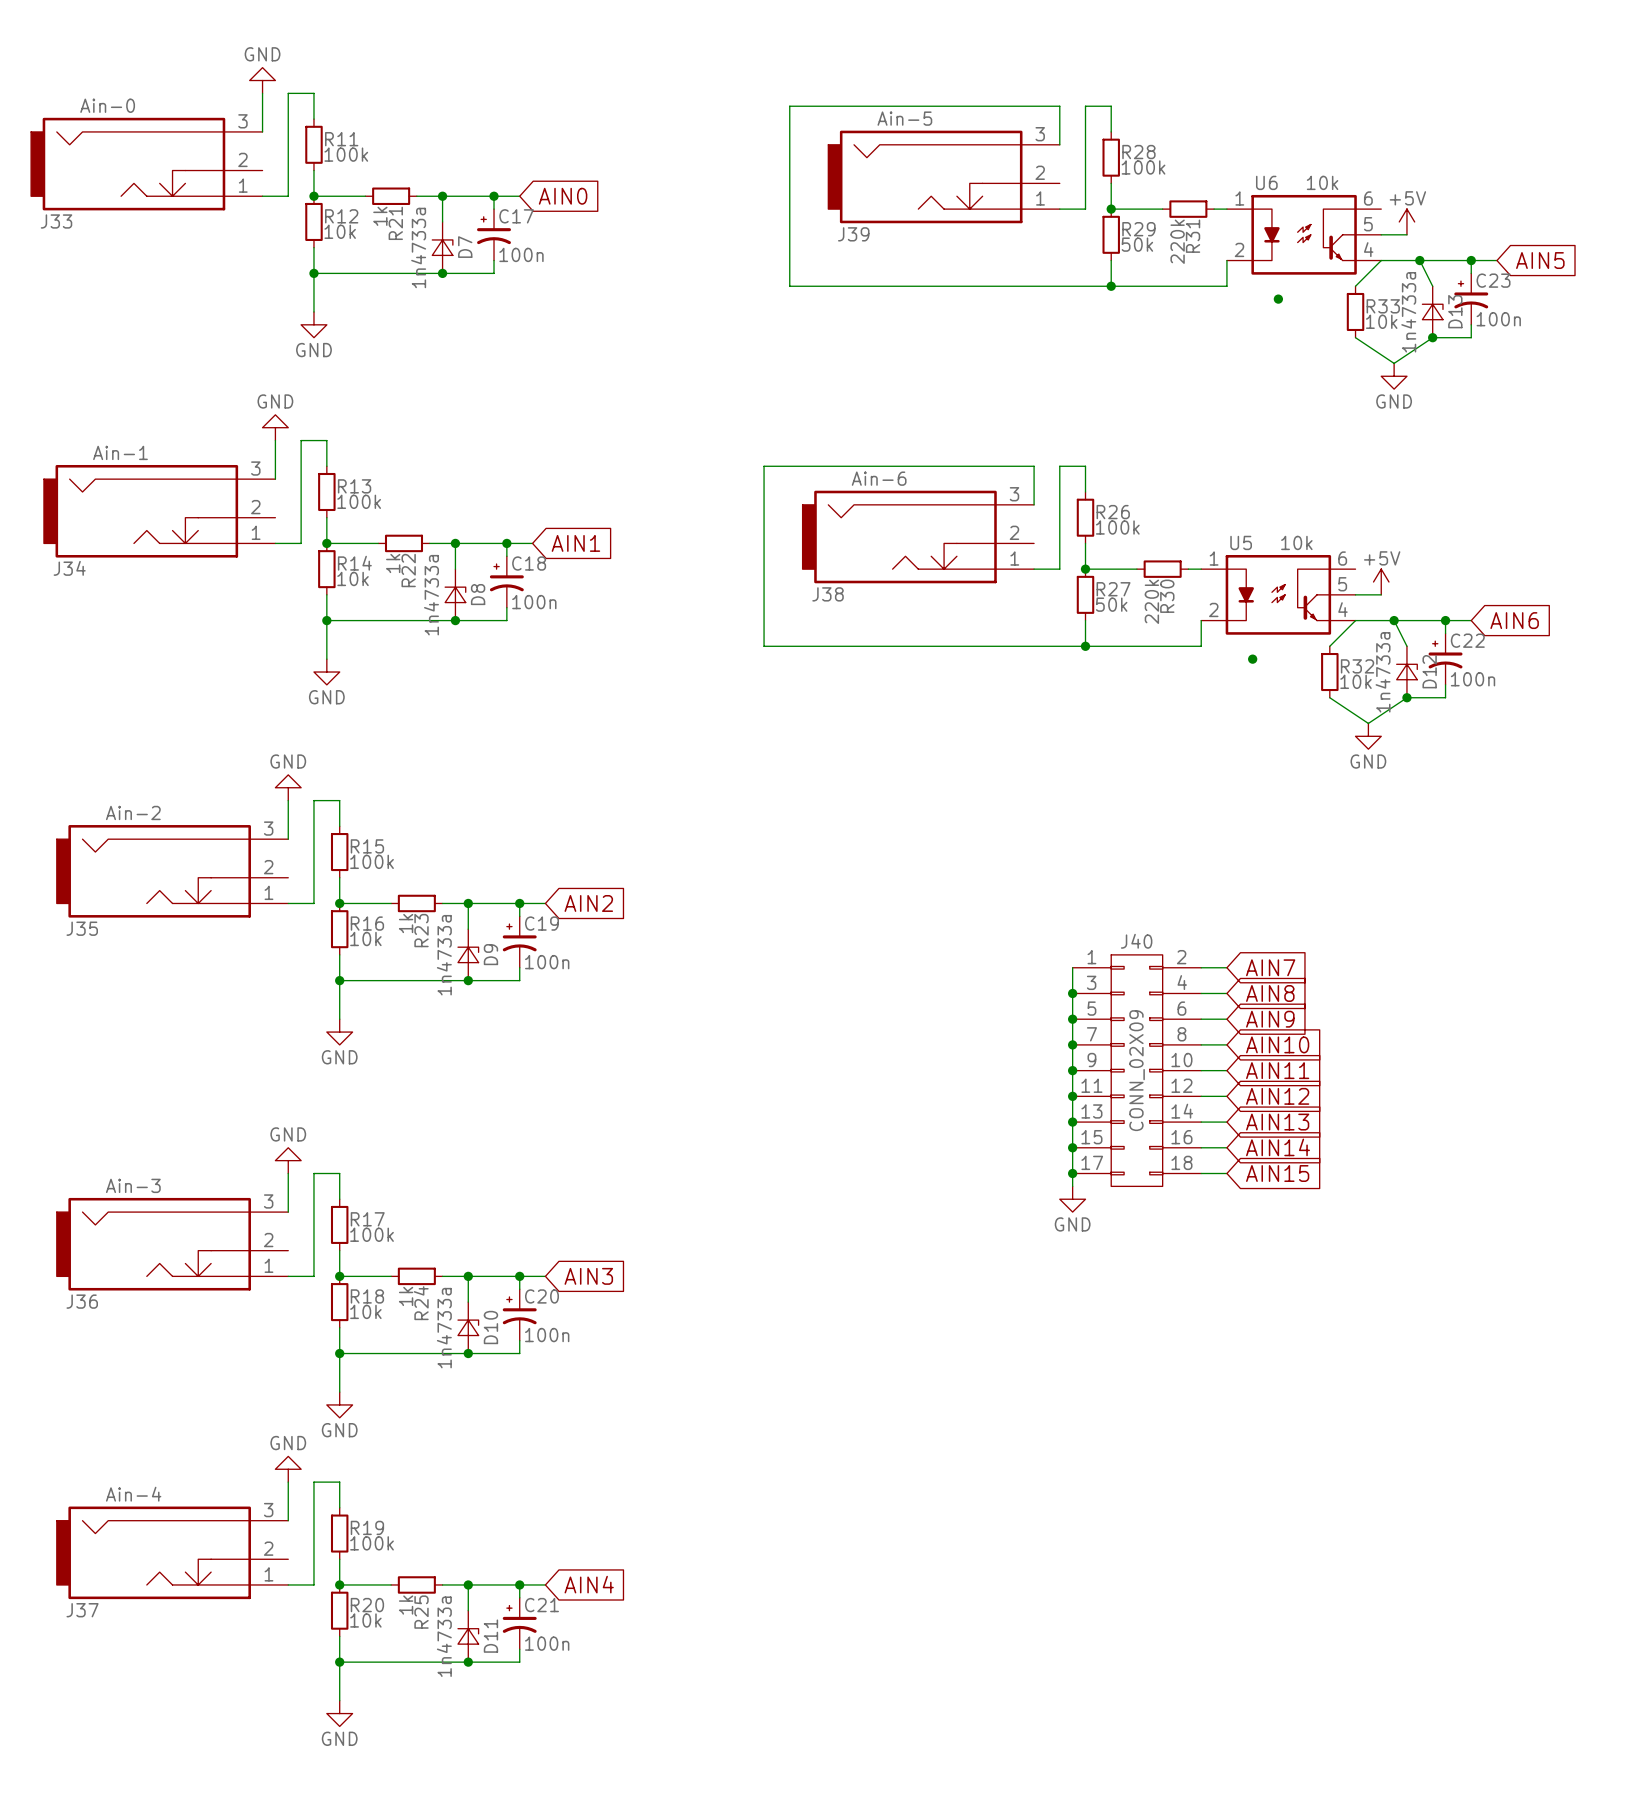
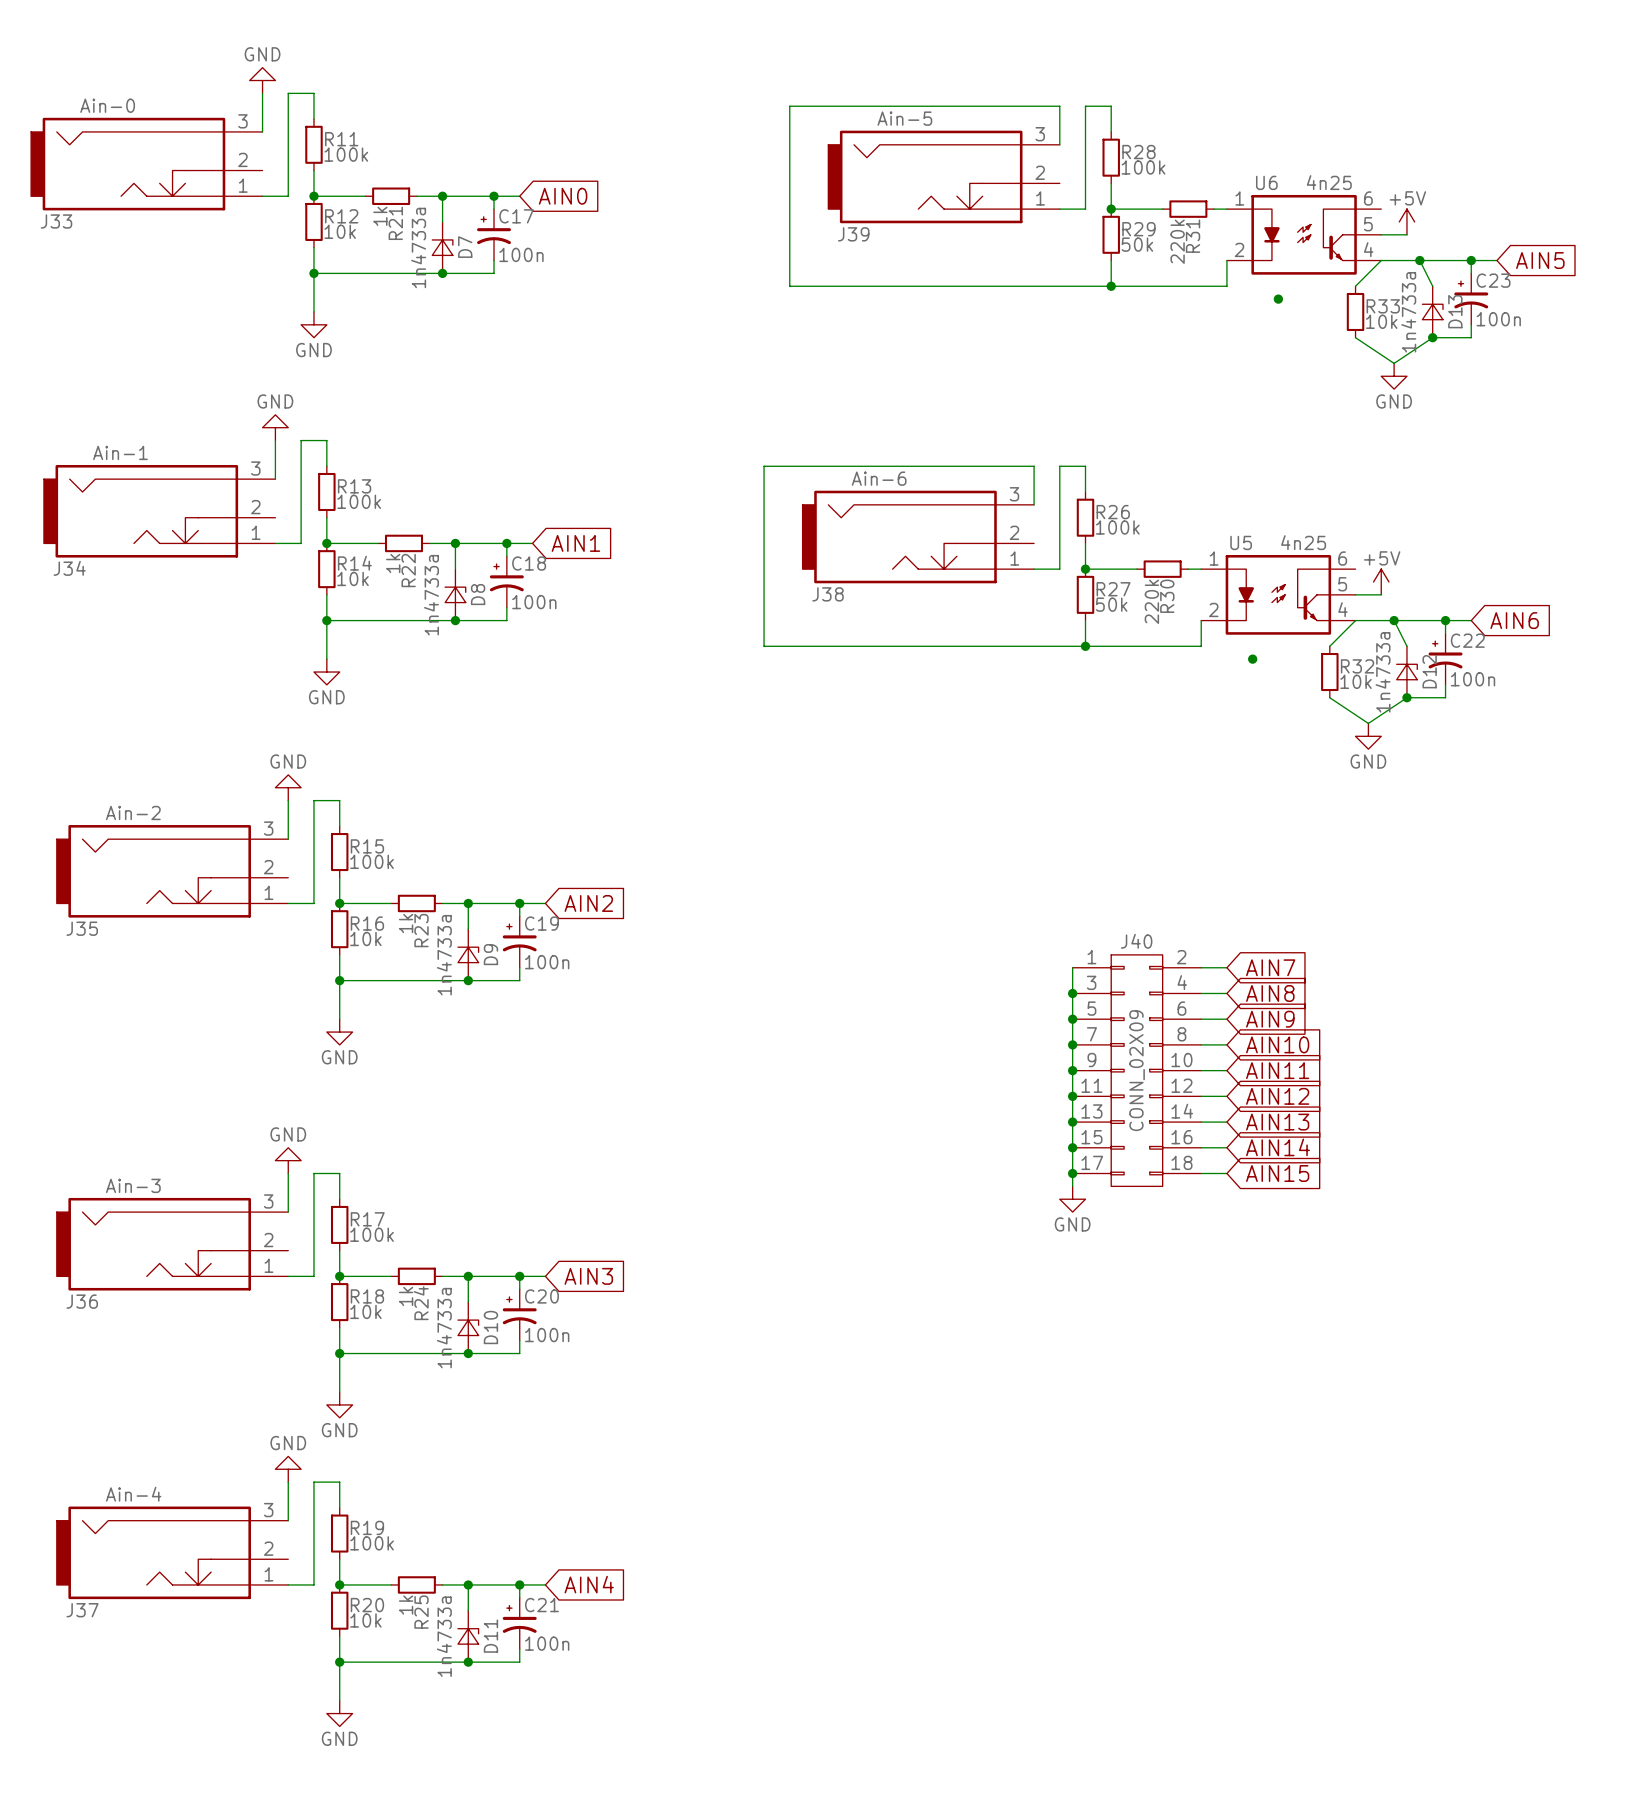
U6 value: 10k (1322, 182) -> 4n25 (1329, 182)
U5 value: 10k (1296, 542) -> 4n25 (1303, 542)

